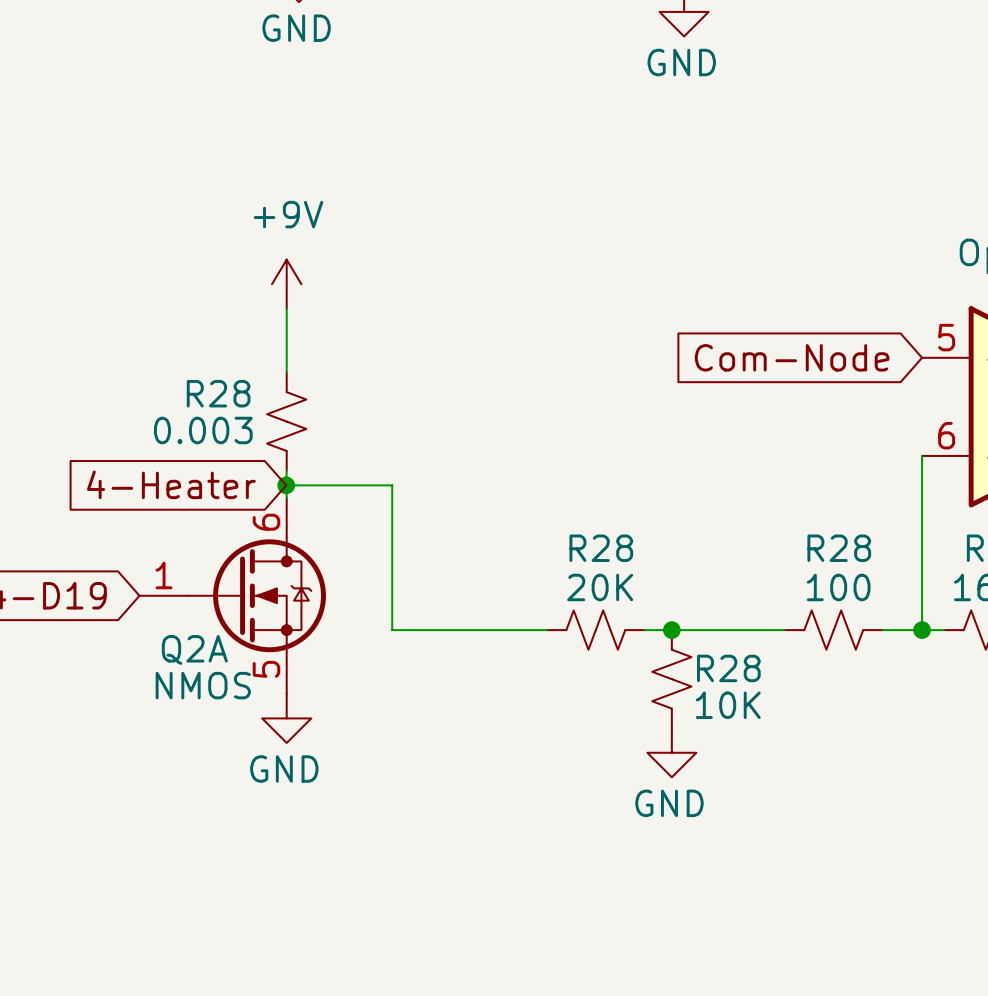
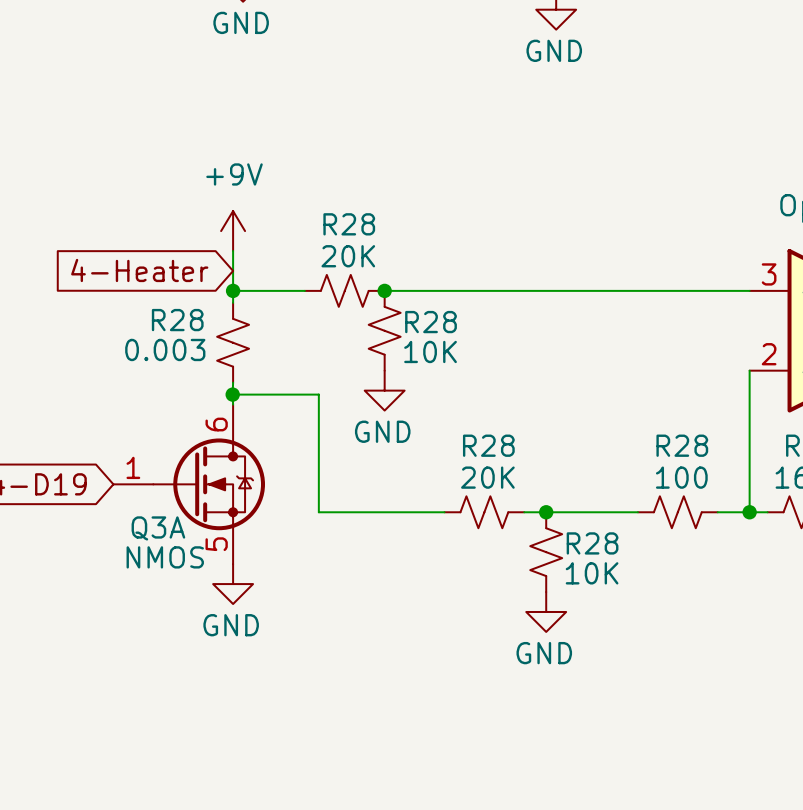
part pin number: 5 (946, 337) -> 3 (769, 274)
wire: none -> (233, 290) (304, 290)
junction: none -> (233, 290)
R28: none -> 20K (344, 290)
wire: none -> (384, 290) (749, 290)
junction: none -> (384, 290)
global label: Com-Node (792, 357) -> none
R28: none -> 10K (384, 330)
part pin number: 6 (946, 435) -> 2 (769, 354)
power symbol: none -> GND (384, 390)
global label position: 4-Heater (171, 484) -> 4-Heater (139, 270)
Q2A name: Q2A (194, 649) -> Q3A (158, 528)

